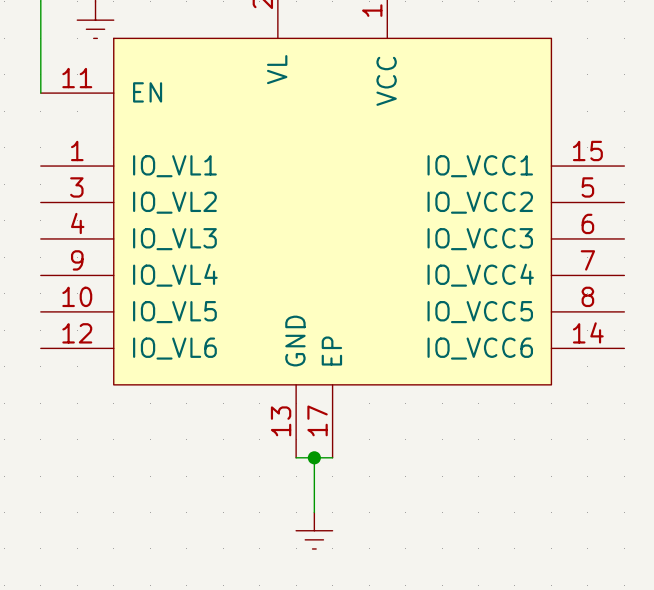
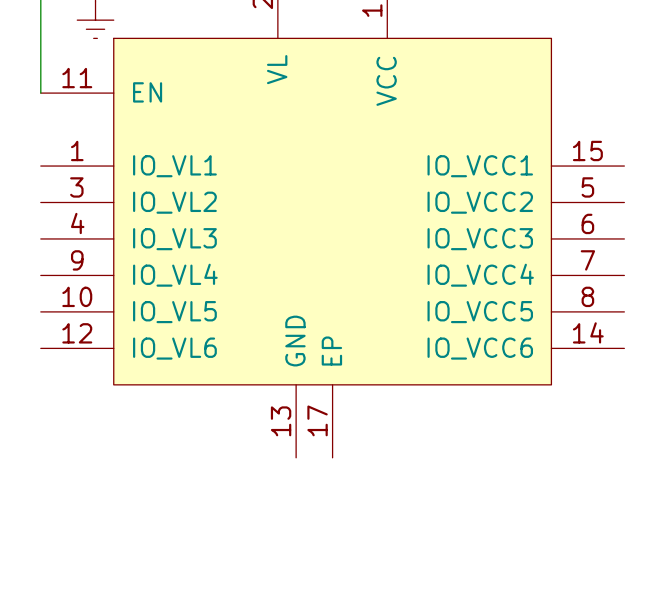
wire: (296, 457) (332, 457) -> none
wire: (314, 457) (314, 512) -> none
junction: (314, 457) -> none
power symbol: (314, 530) -> none

